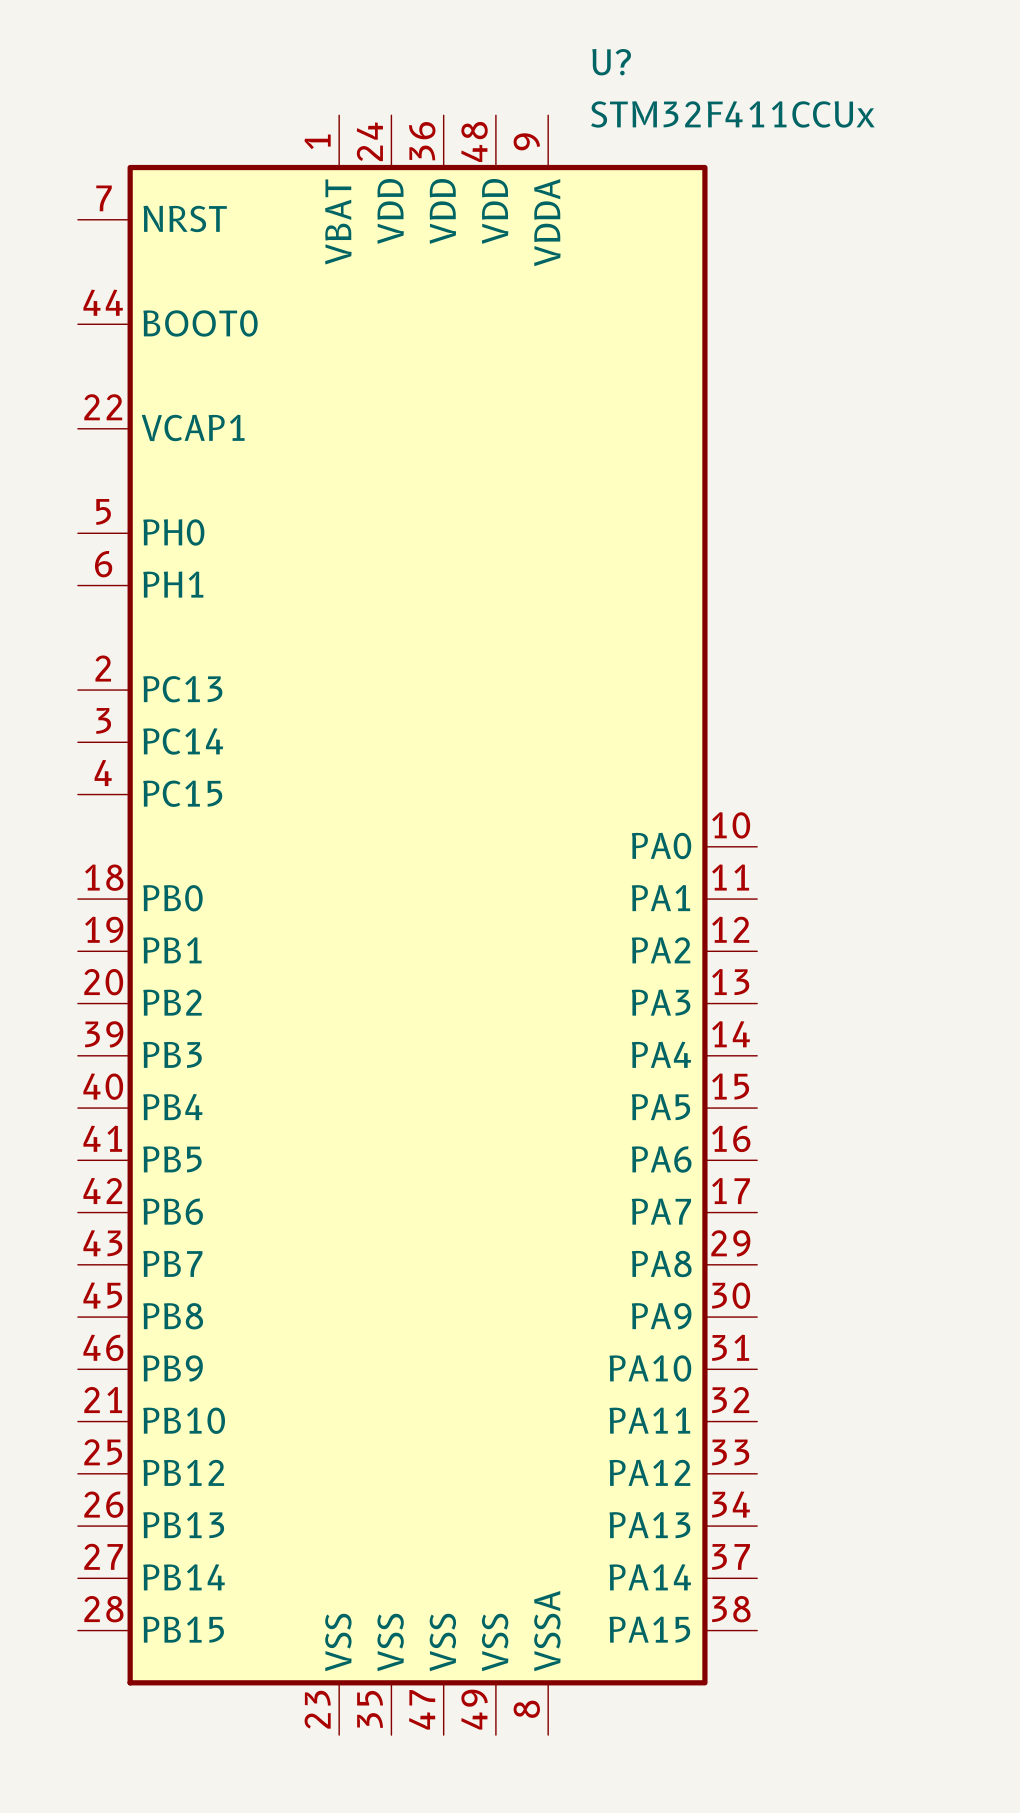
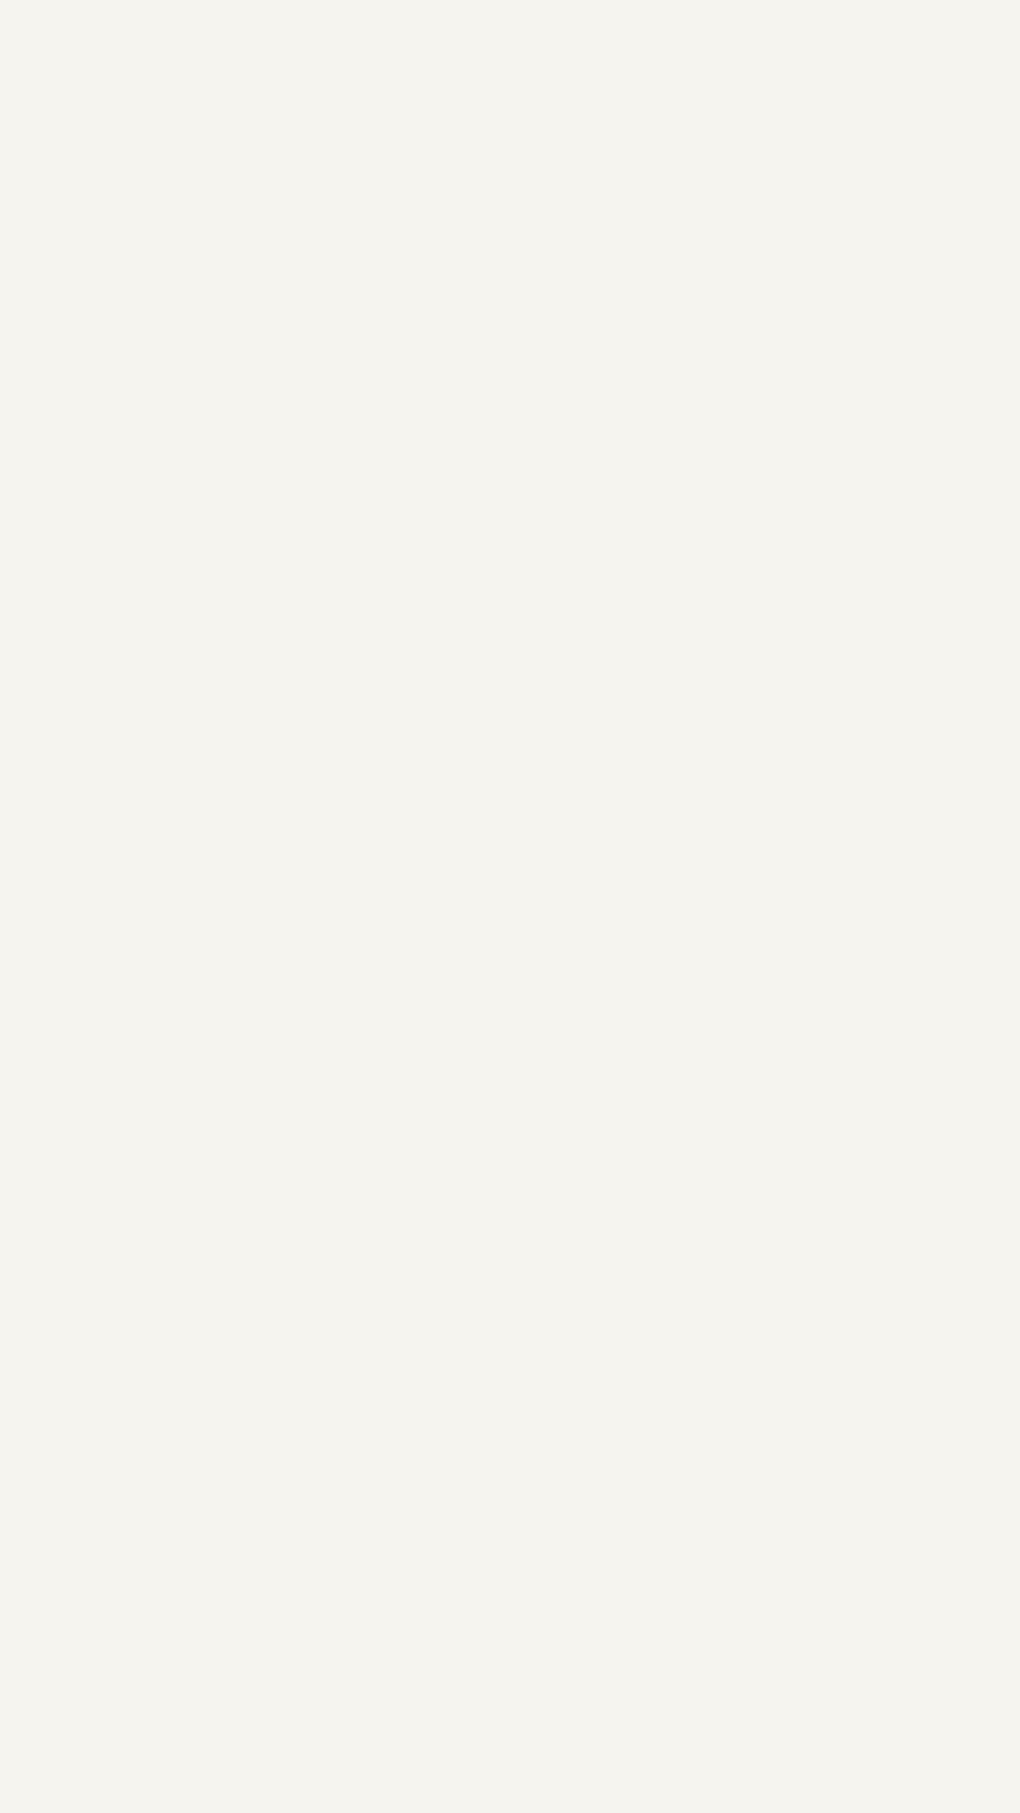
U?: STM32F411CCUx (417, 925) -> none

